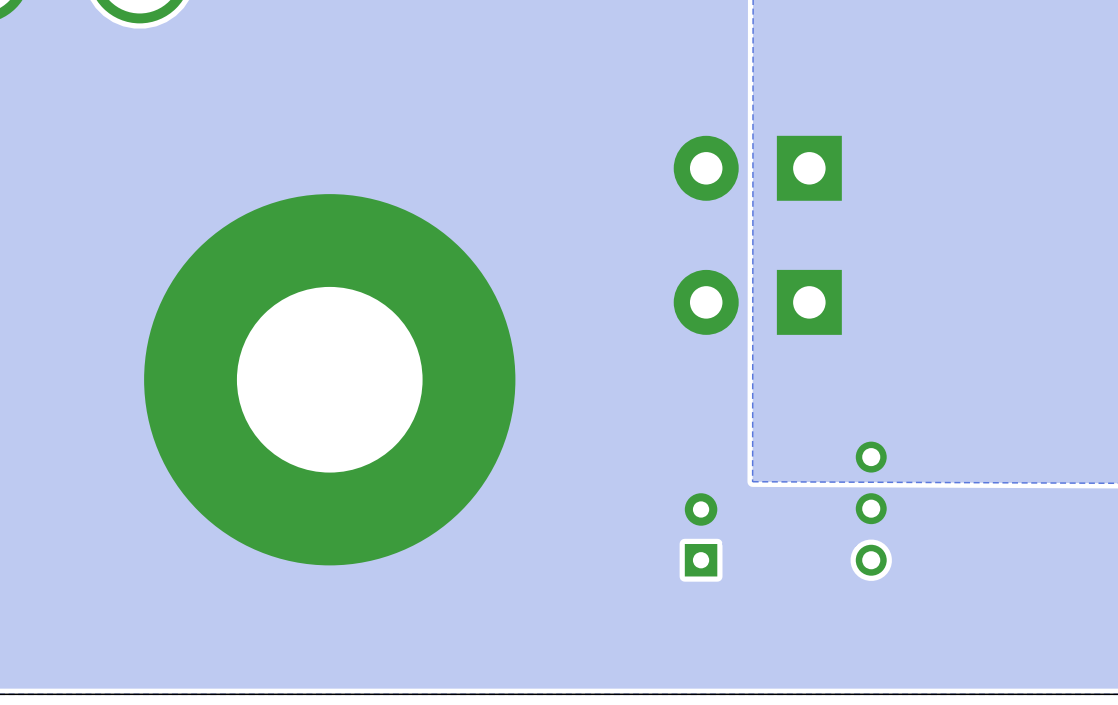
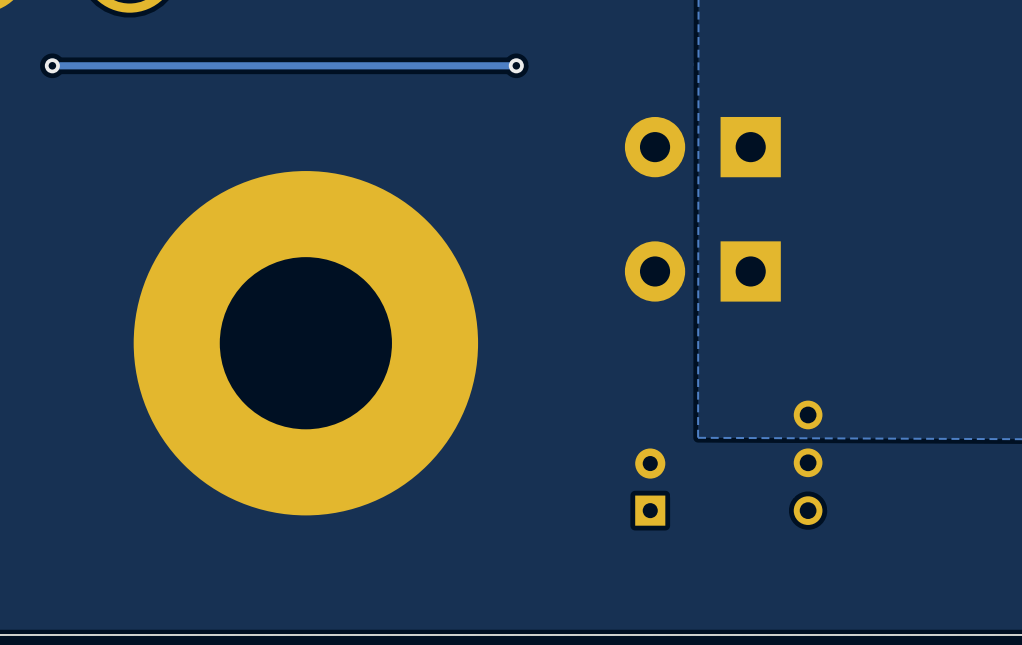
via: none -> (52, 65)
track: none -> (516, 65) (52, 65)
via: none -> (516, 65)

